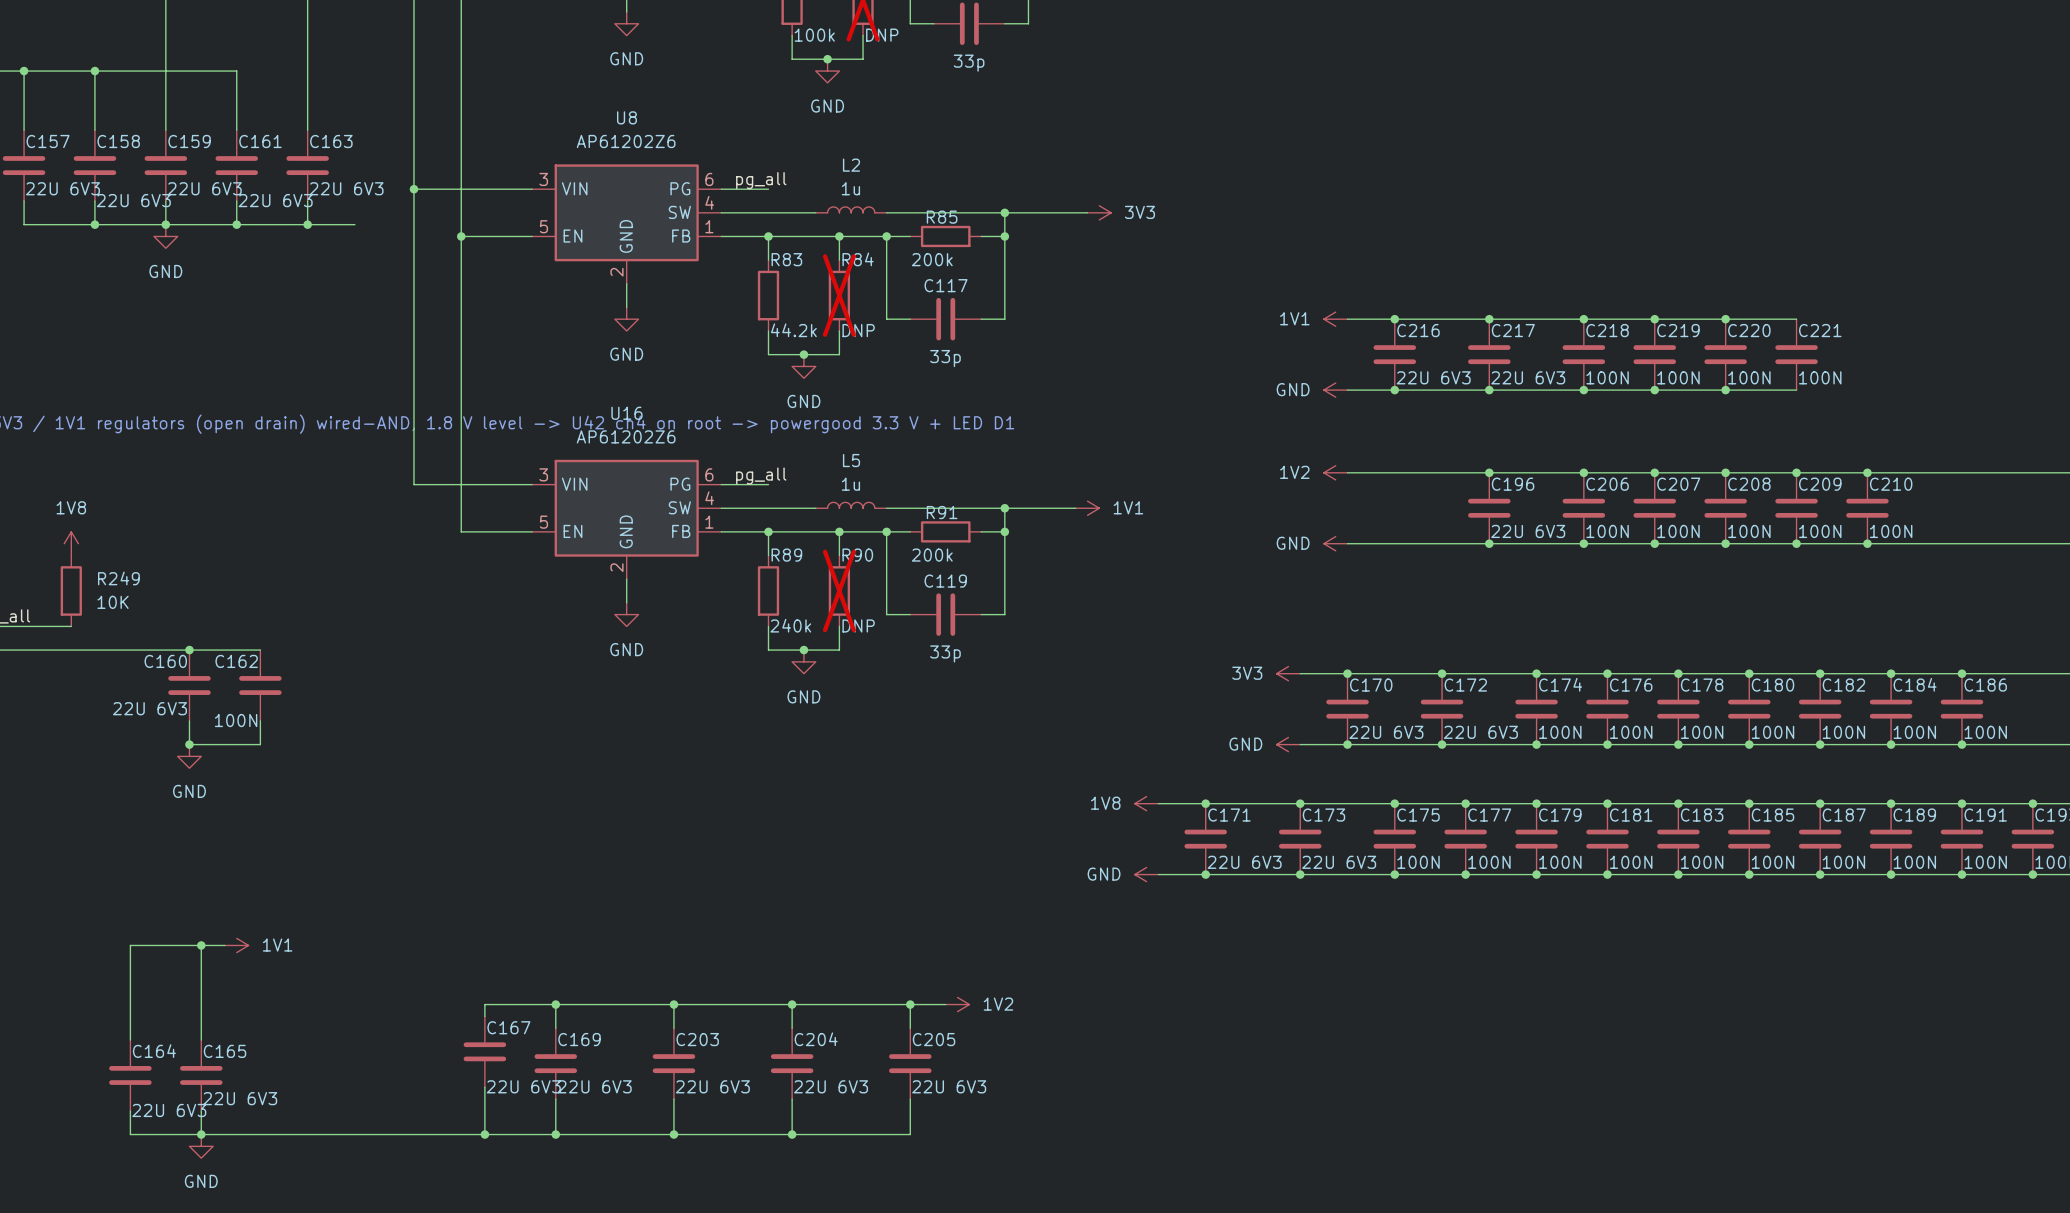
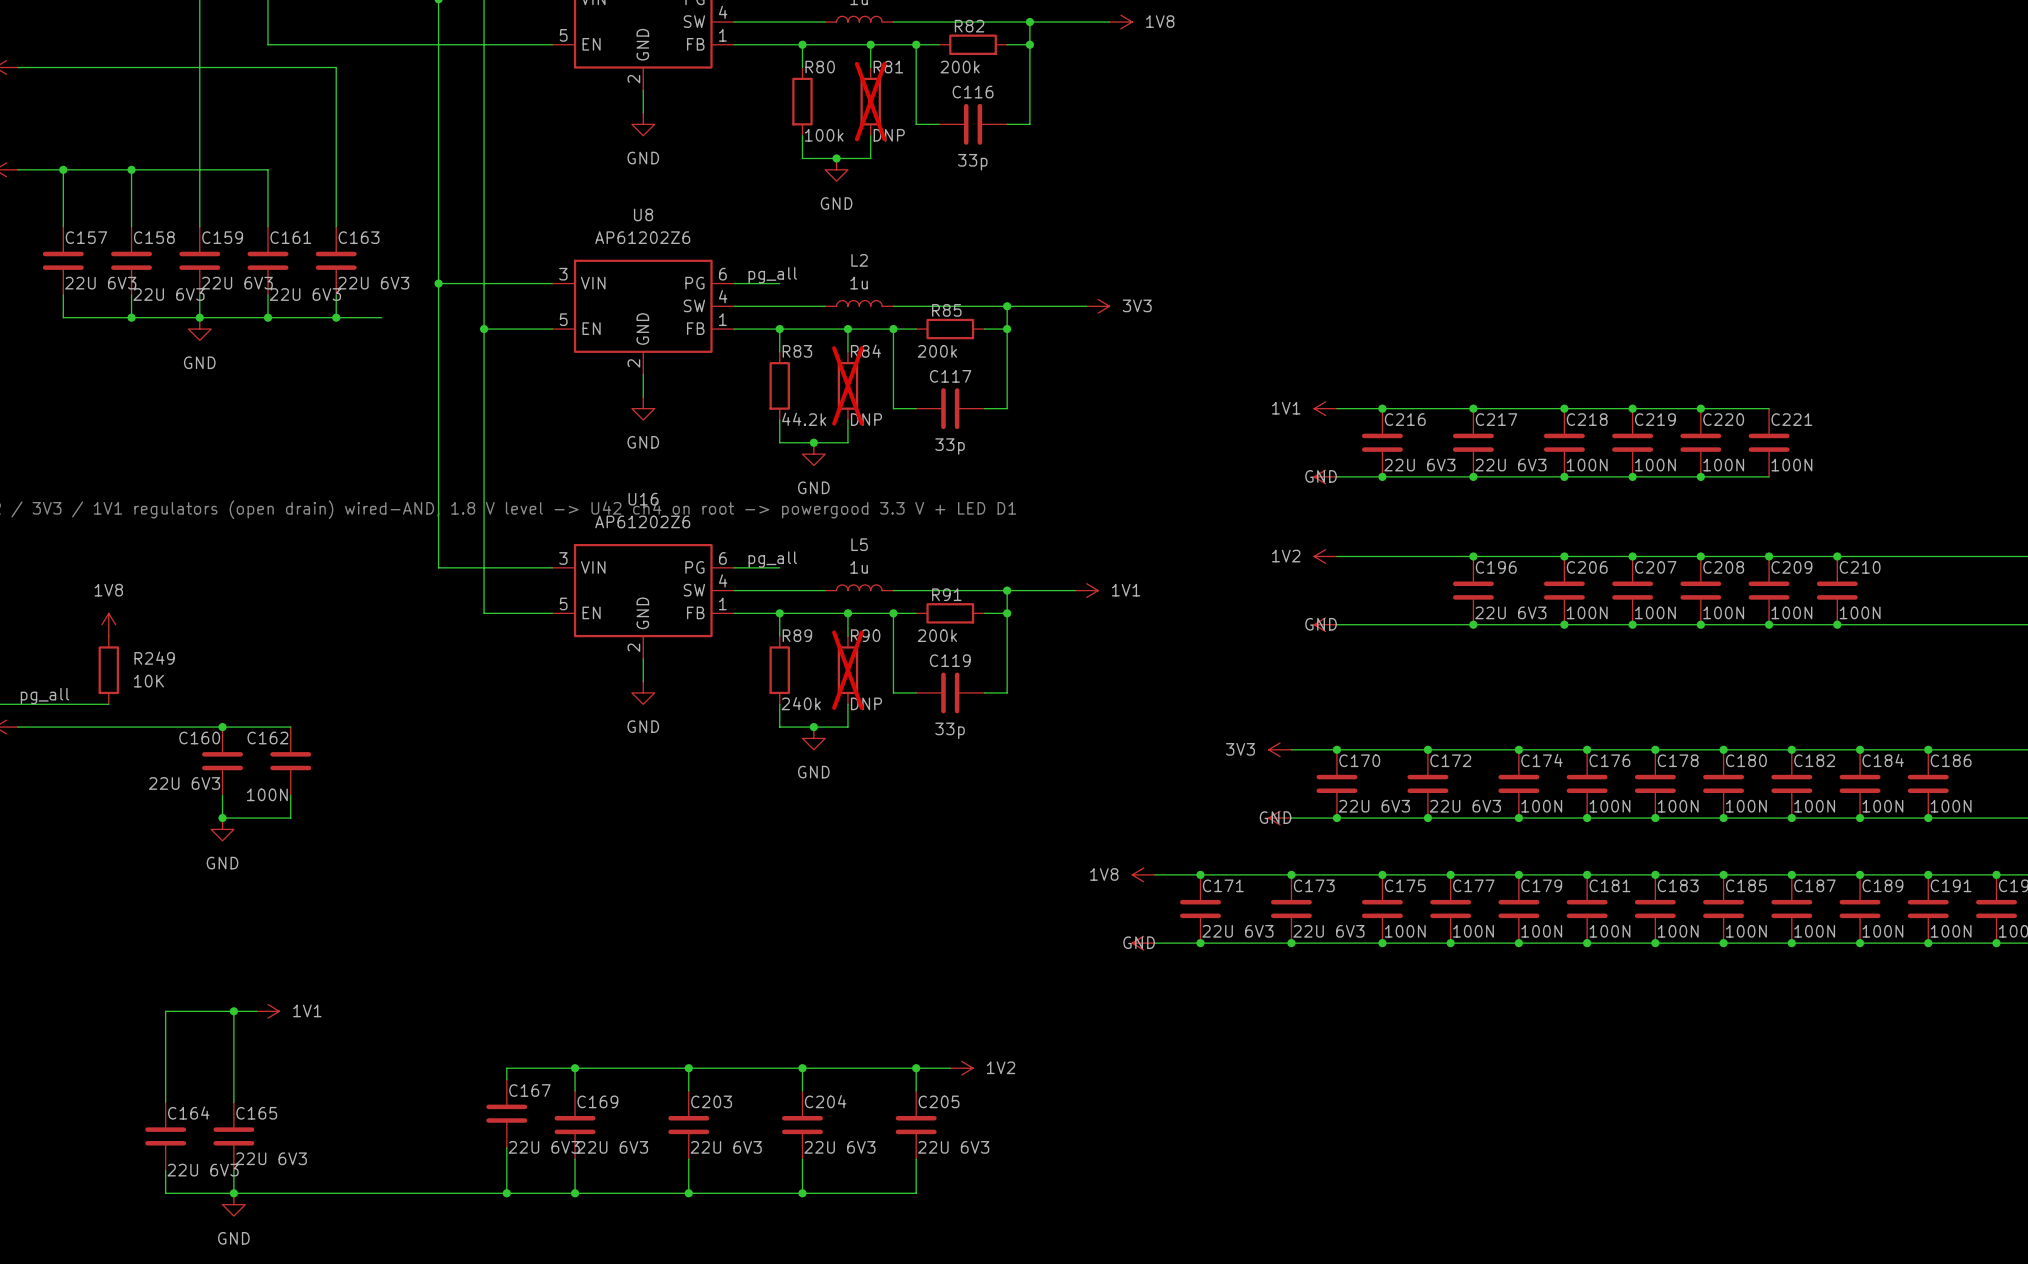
power symbol text position: GND (1293, 389) -> GND (1321, 476)
power symbol text position: GND (1293, 543) -> GND (1321, 624)
power symbol text position: GND (1245, 744) -> GND (1275, 817)
power symbol text position: GND (1104, 874) -> GND (1139, 942)

